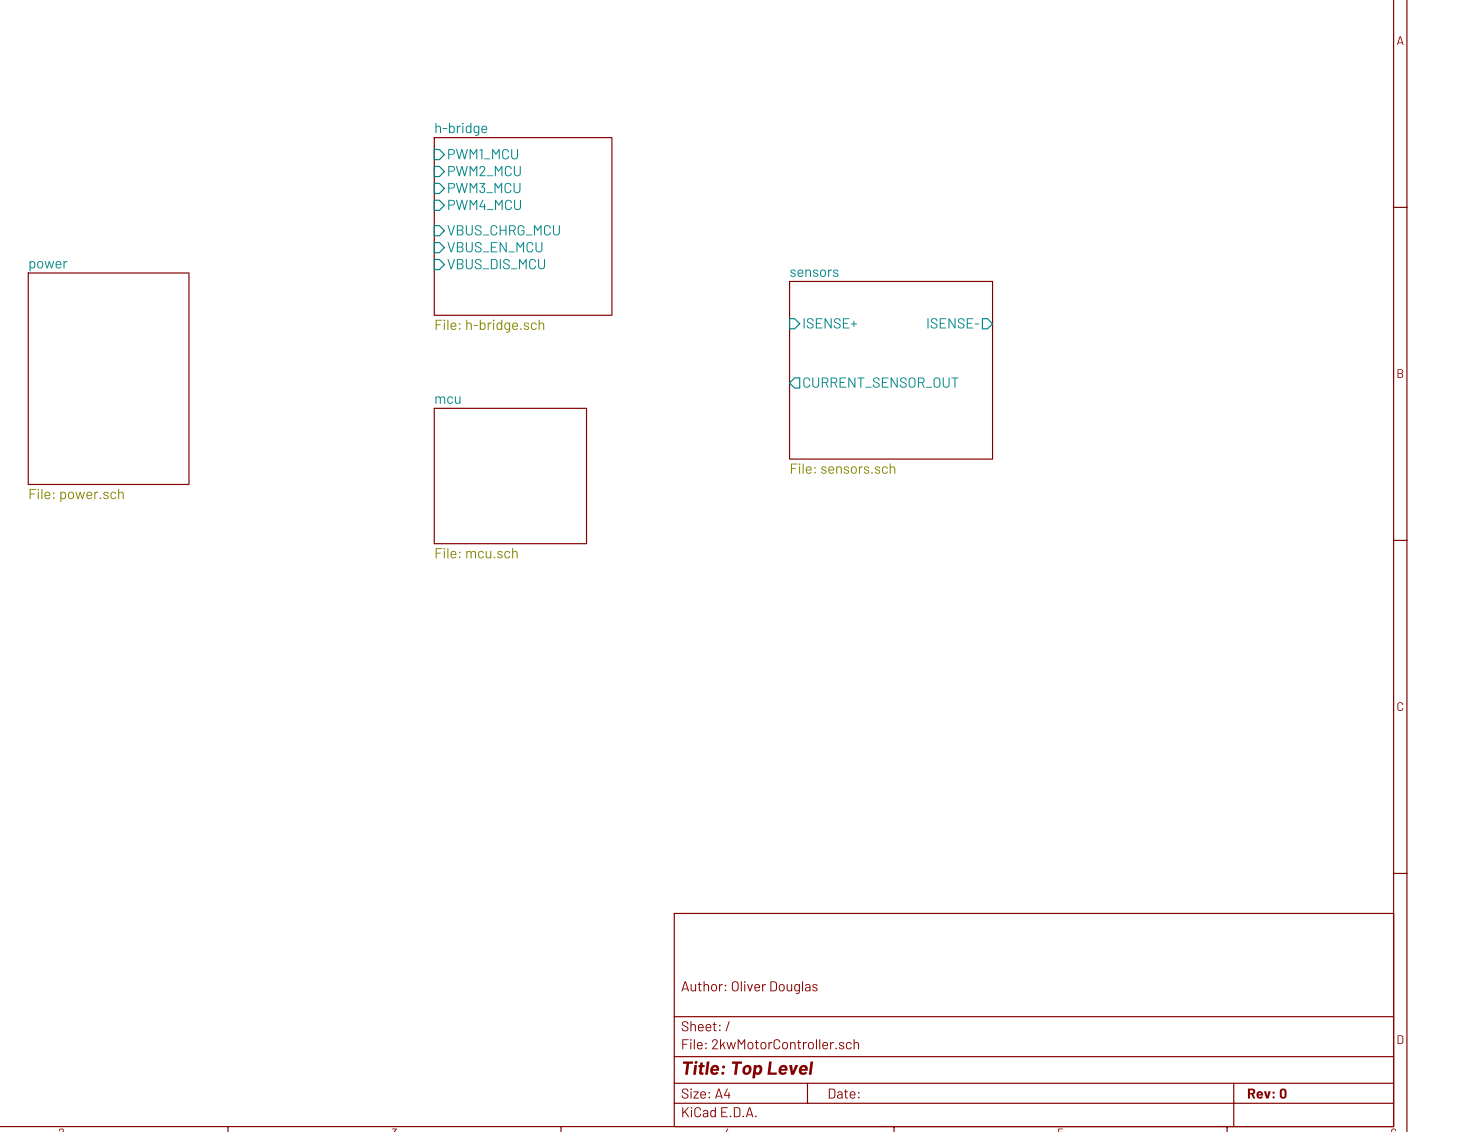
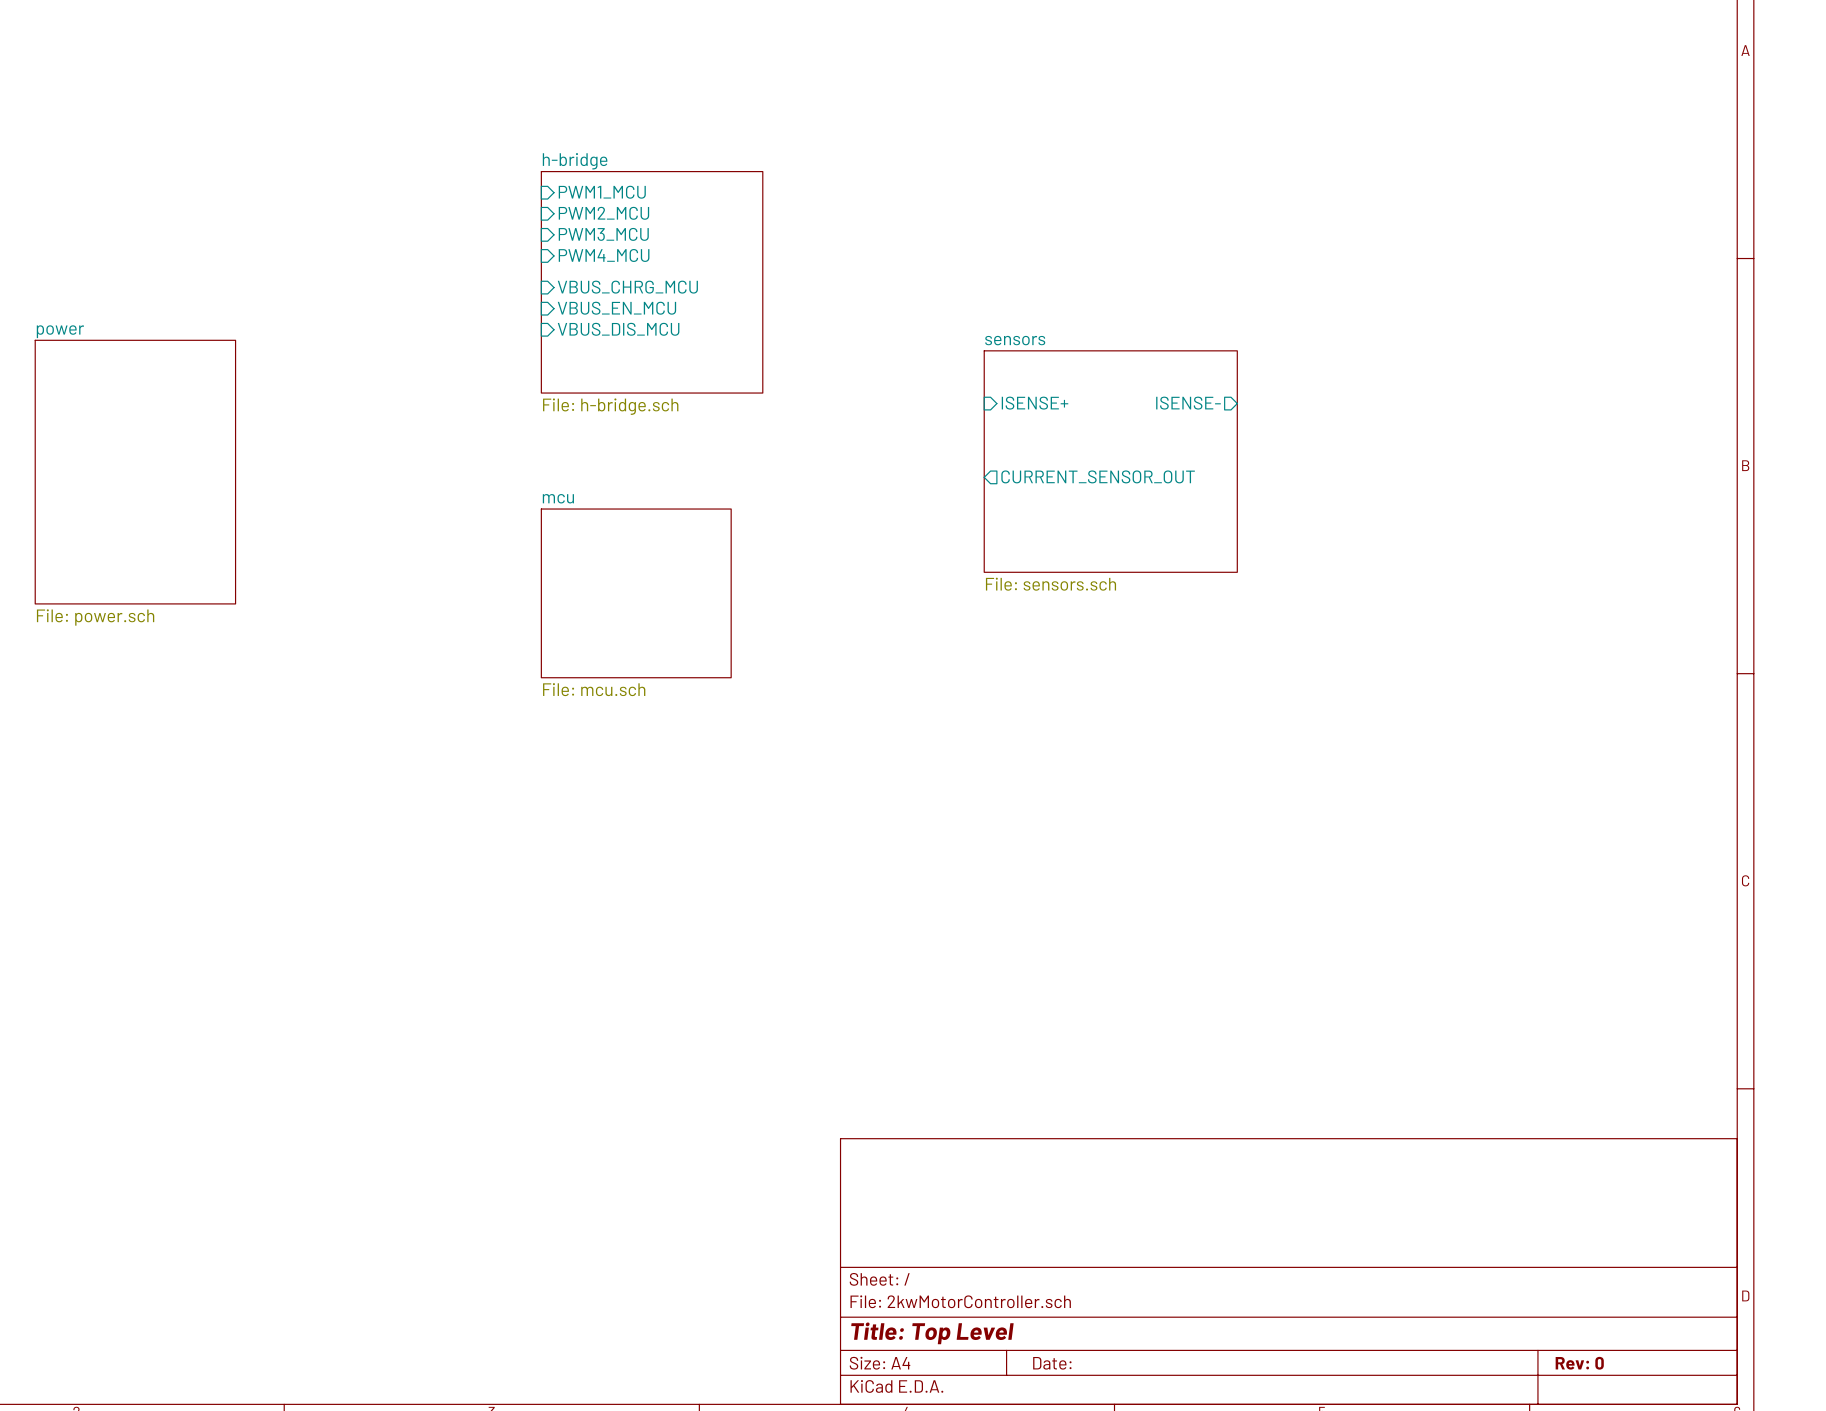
title block: Author: Oliver Douglas (749, 987) -> none

